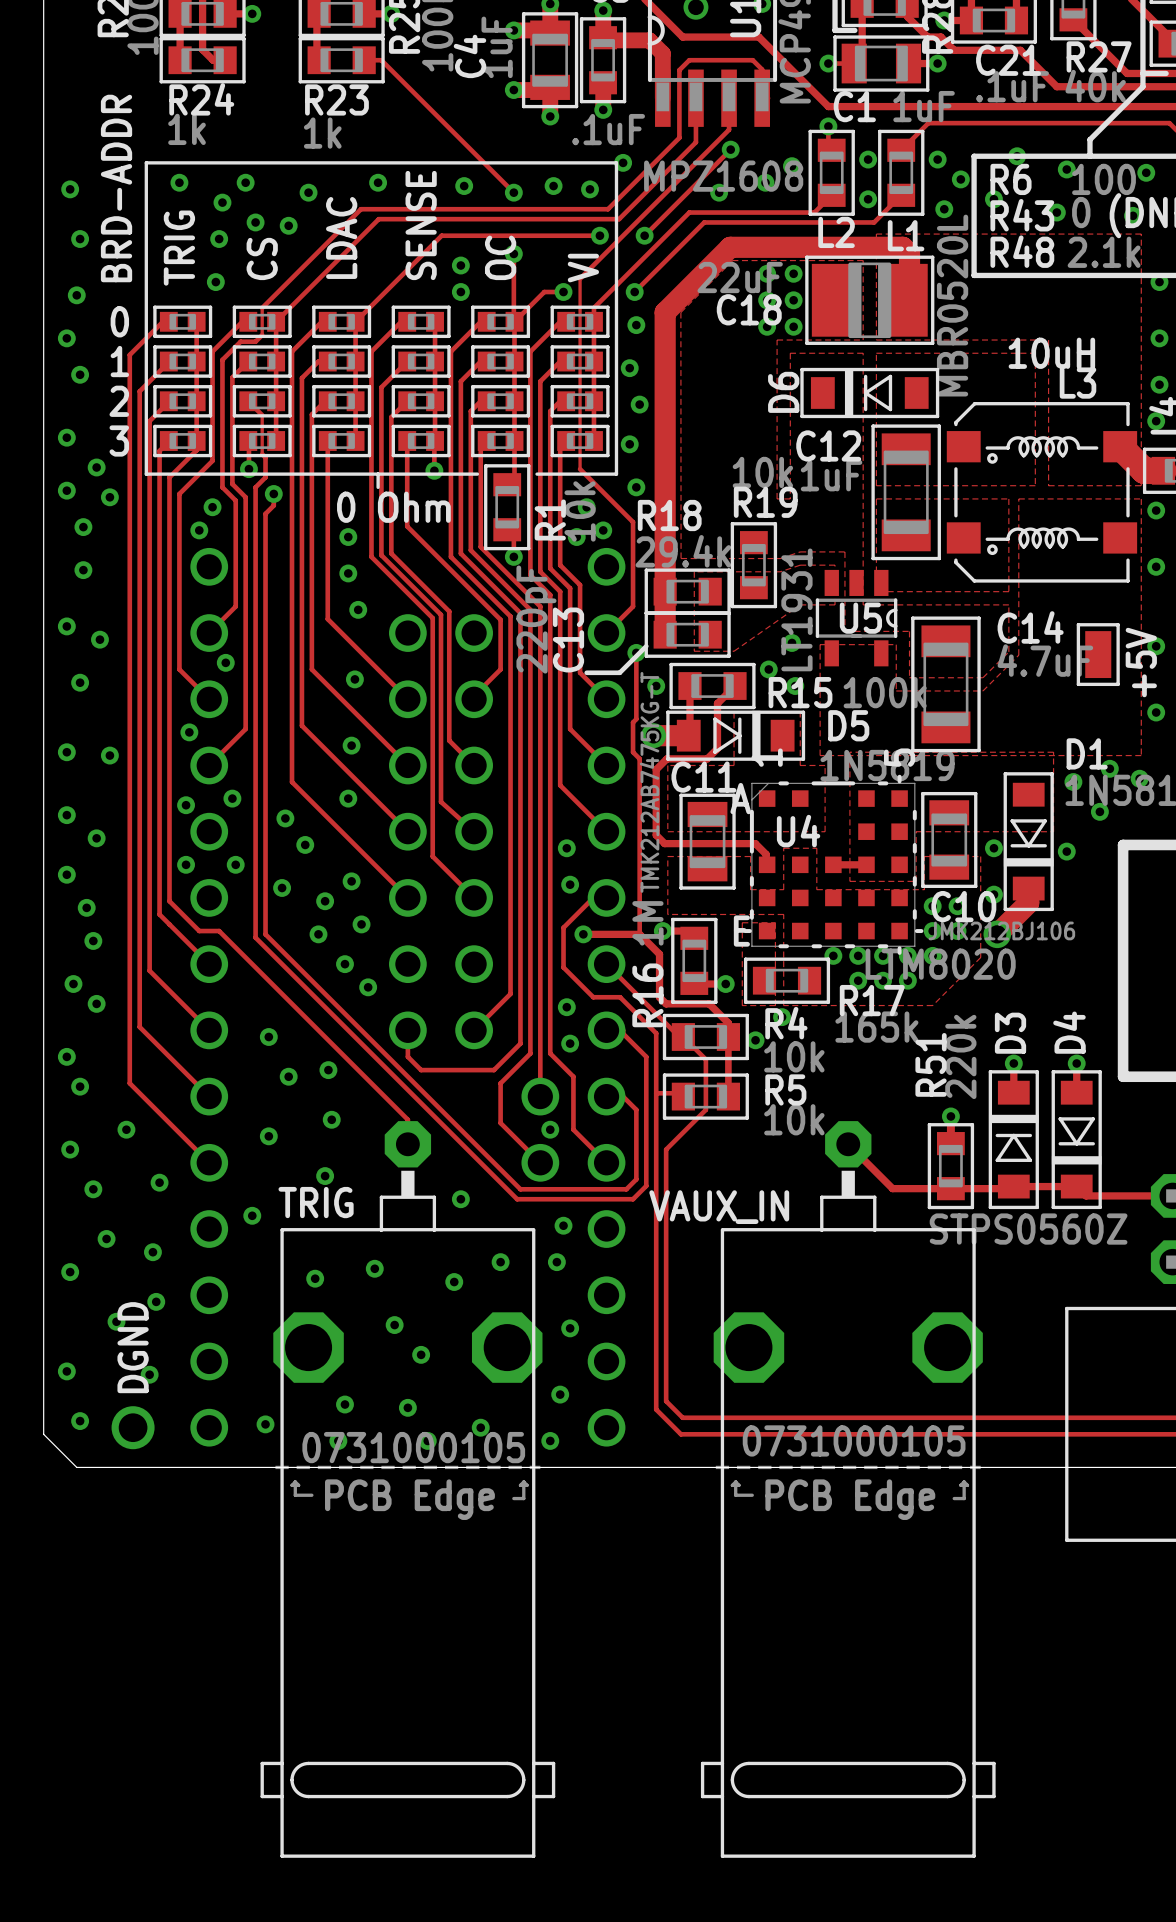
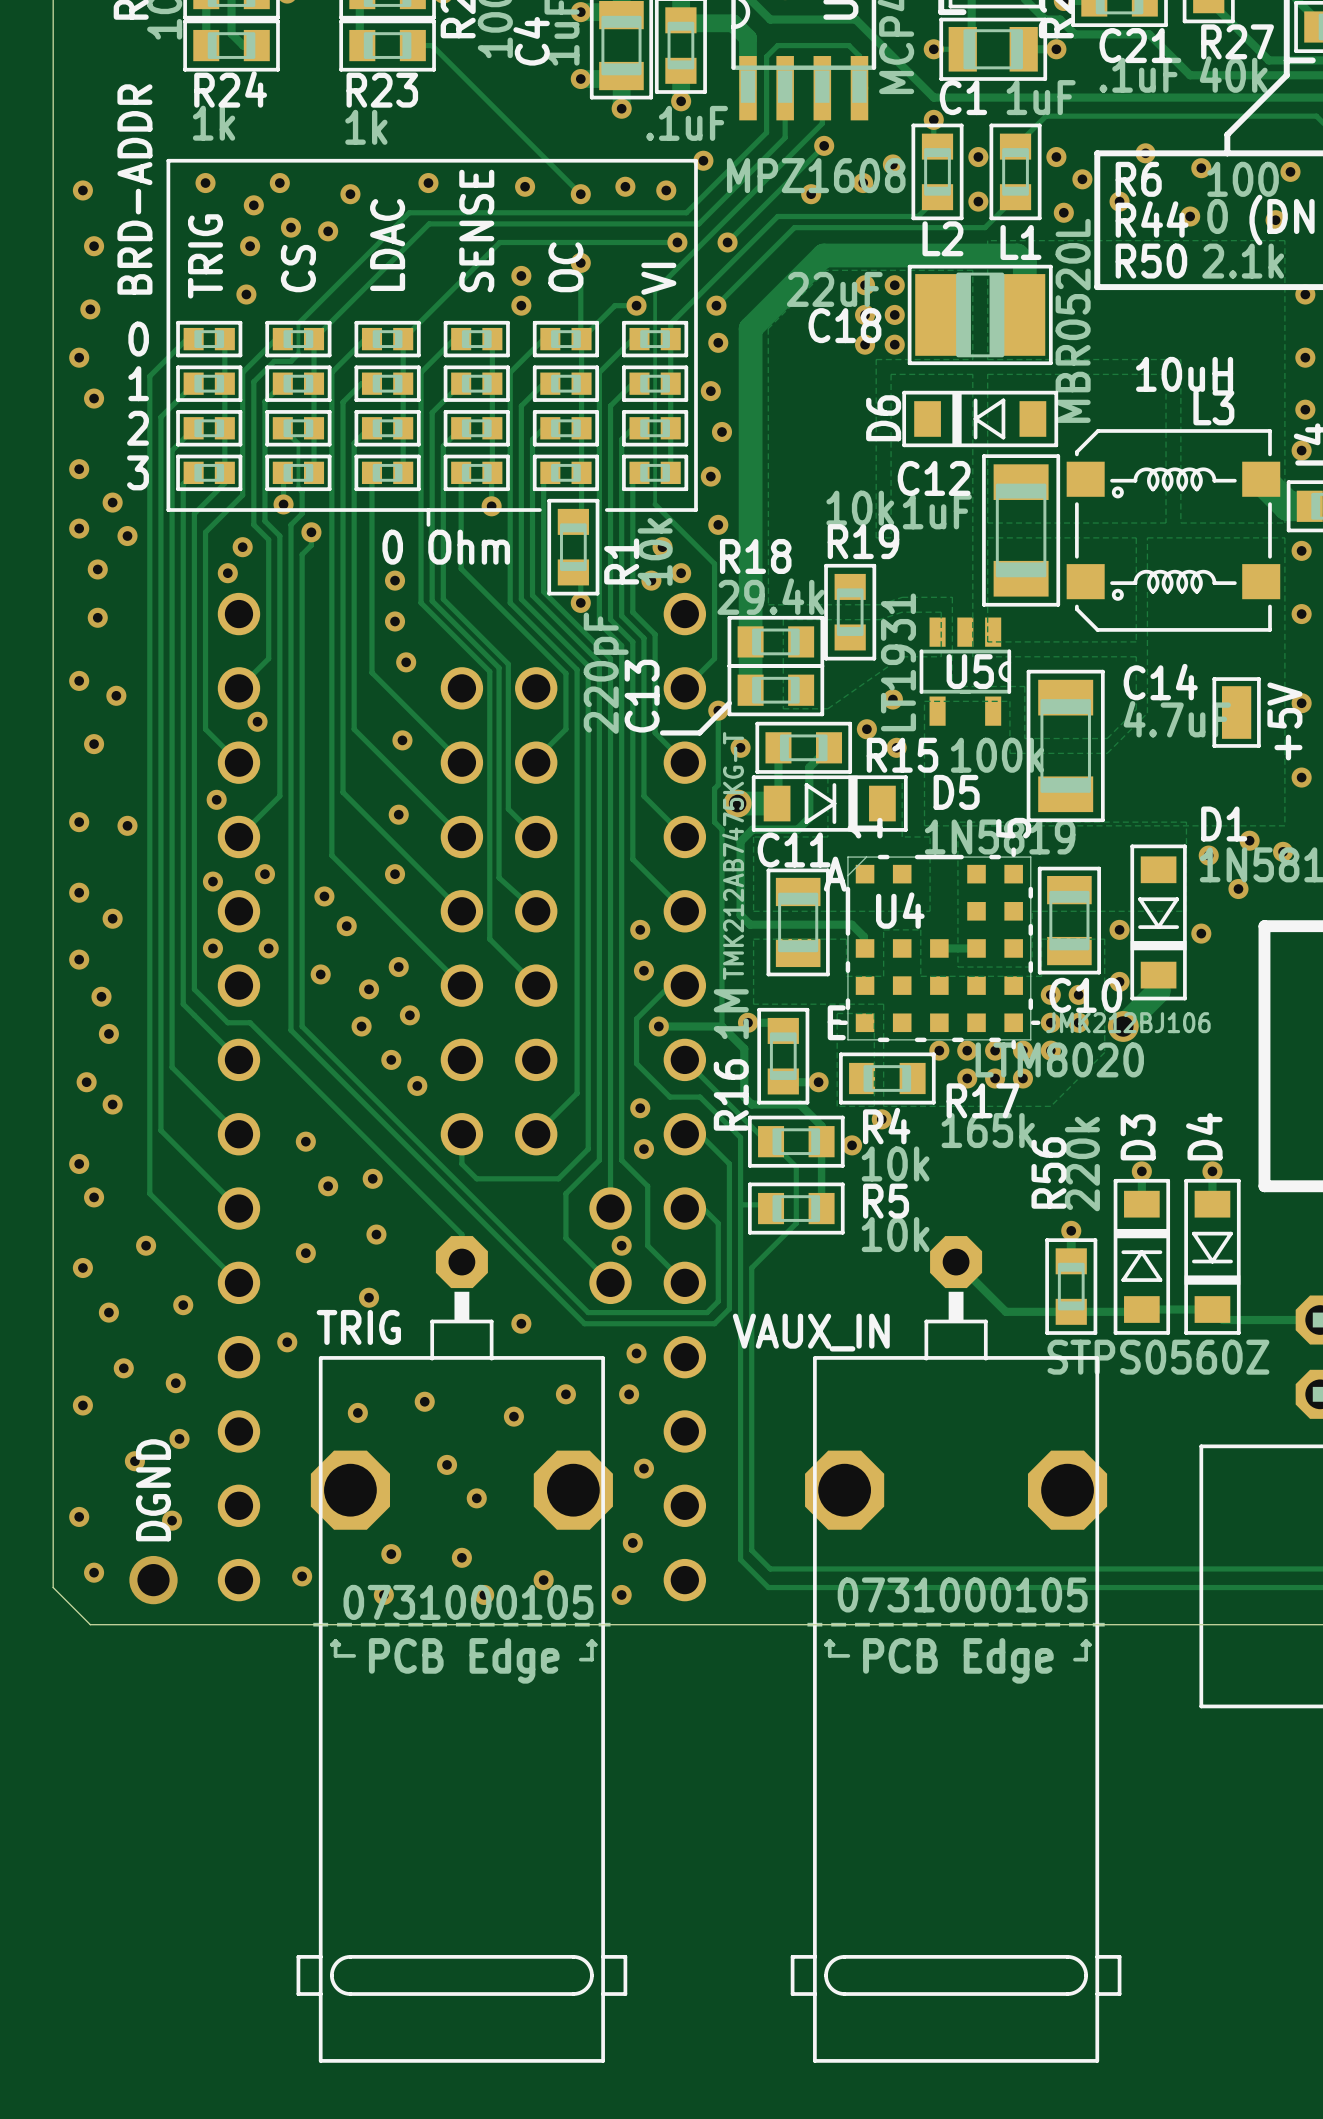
R43 name: R43 (1022, 215) -> R44 (1152, 219)
R48 name: R48 (1022, 251) -> R50 (1151, 261)
R51 name: R51 (931, 1064) -> R56 (1048, 1172)

